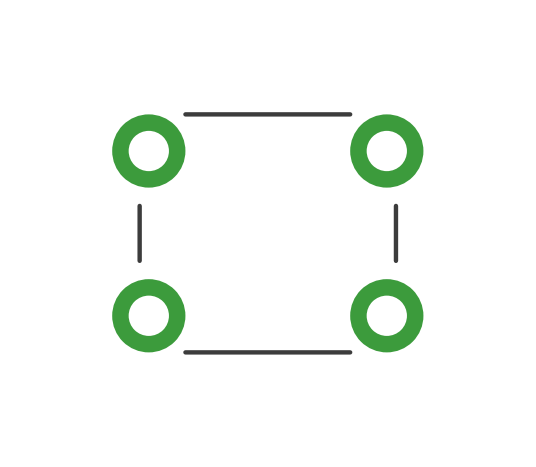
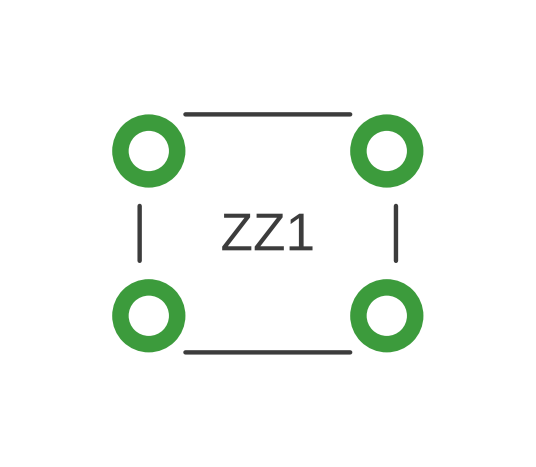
ZZ1 name: none -> ZZ1 (267, 232)

